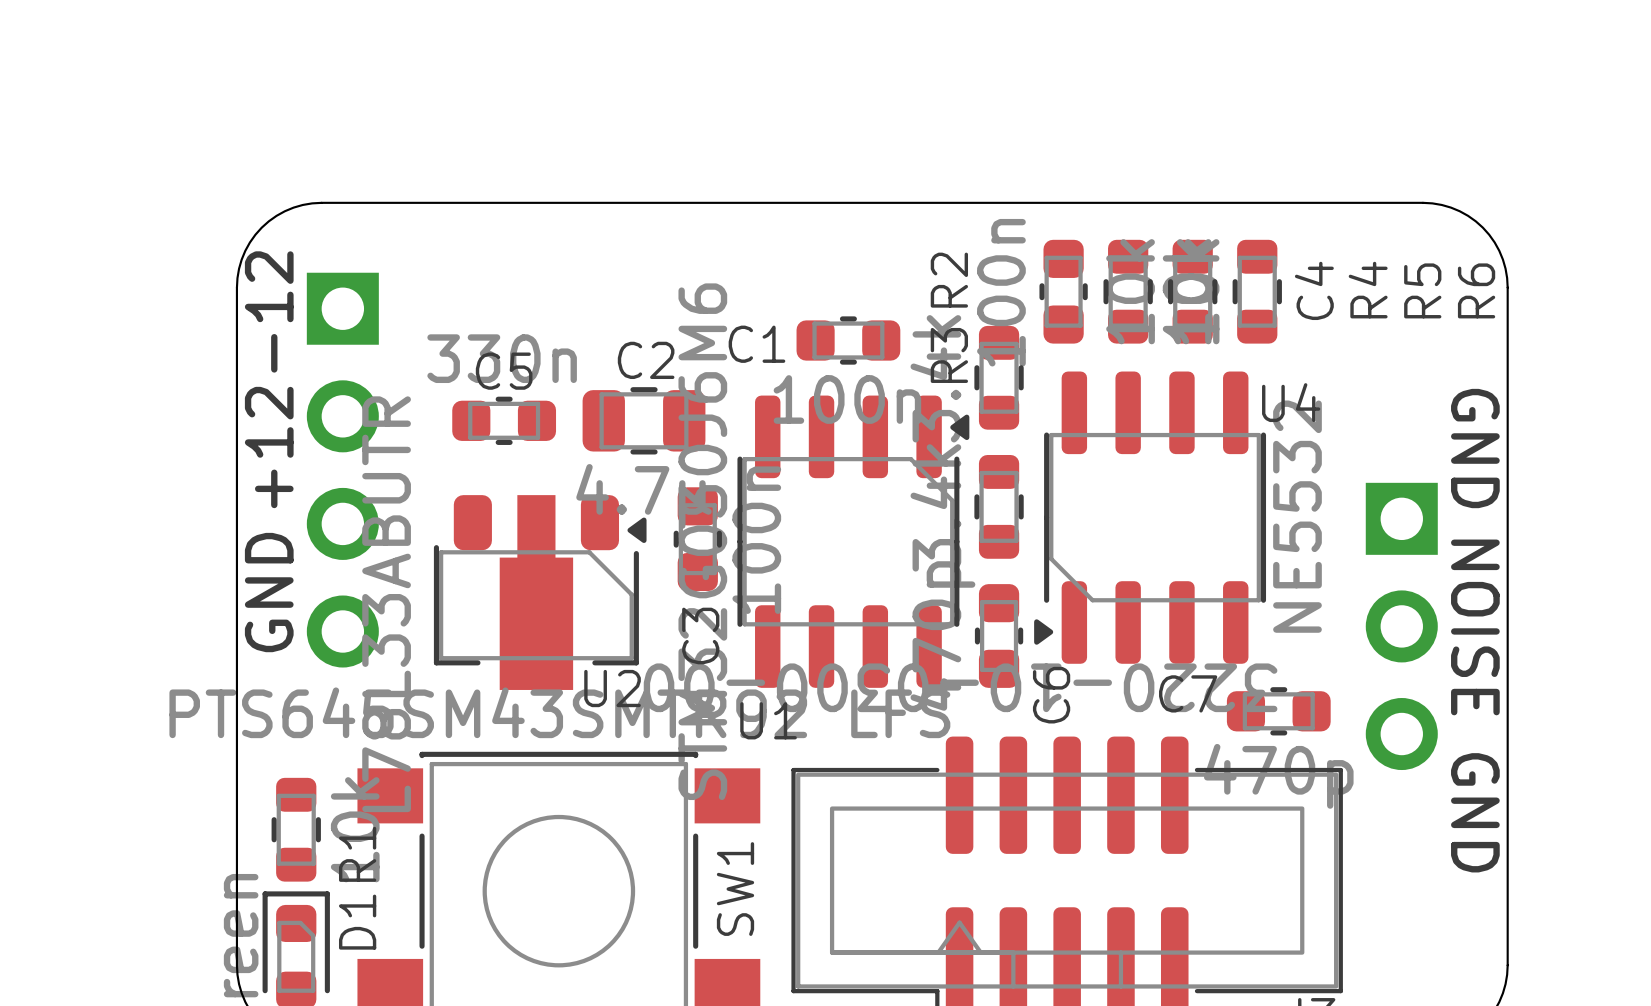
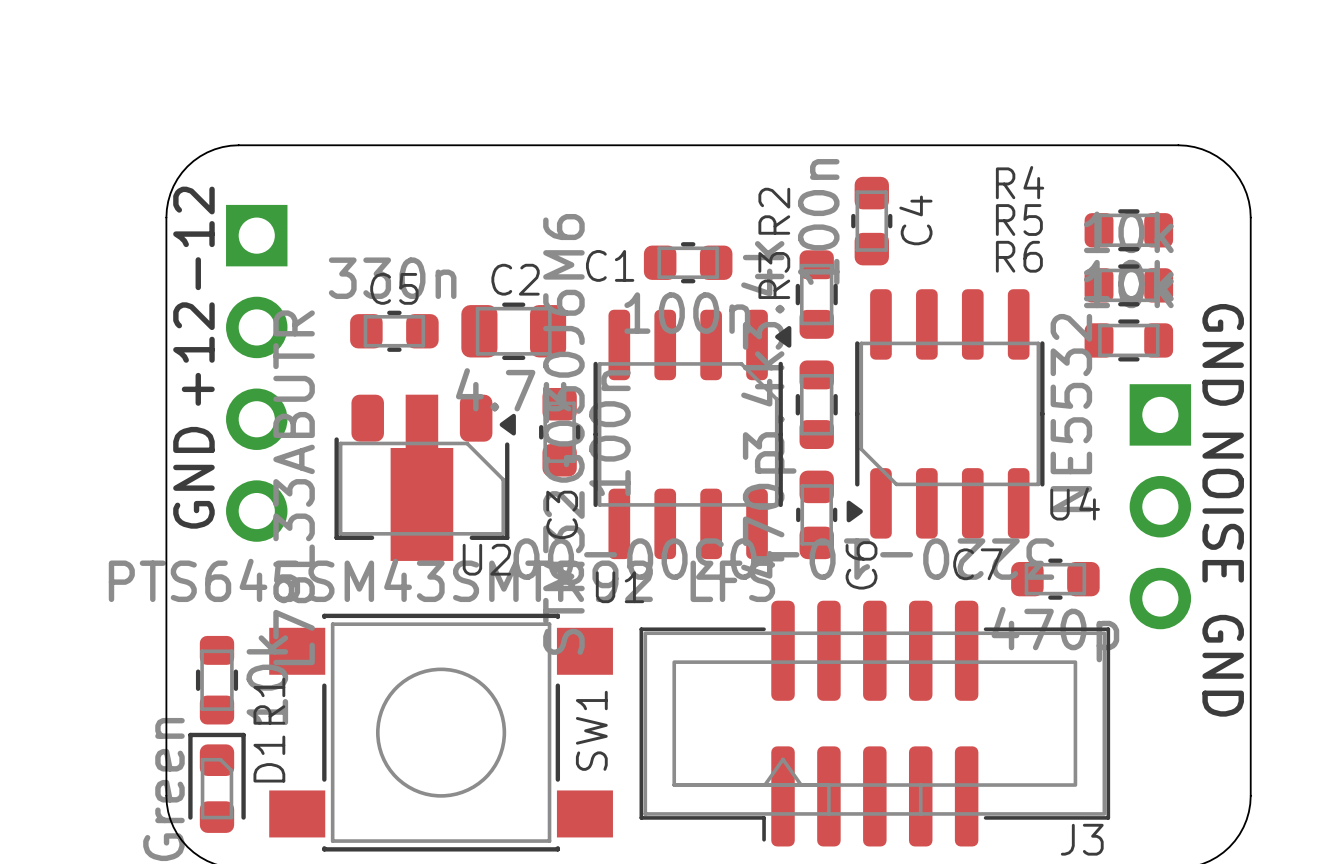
C4 name position: C4 (1314, 290) -> C4 (915, 220)
R4 name position: R4 (1368, 290) -> R4 (1020, 182)
R5 name position: R5 (1422, 290) -> R5 (1019, 220)
R6 name position: R6 (1476, 290) -> R6 (1019, 256)
R4 rotation: 0° (1128, 291) -> 90° clockwise (1128, 230)
R4 position: (1128, 291) -> (1128, 230)
R5 rotation: 0° (1192, 291) -> 90° clockwise (1128, 285)
R5 position: (1192, 291) -> (1128, 285)
R6 rotation: 0° (1257, 291) -> 90° clockwise (1128, 340)
R6 position: (1257, 291) -> (1128, 340)
U4 name position: U4 (1291, 402) -> U4 (1075, 503)

